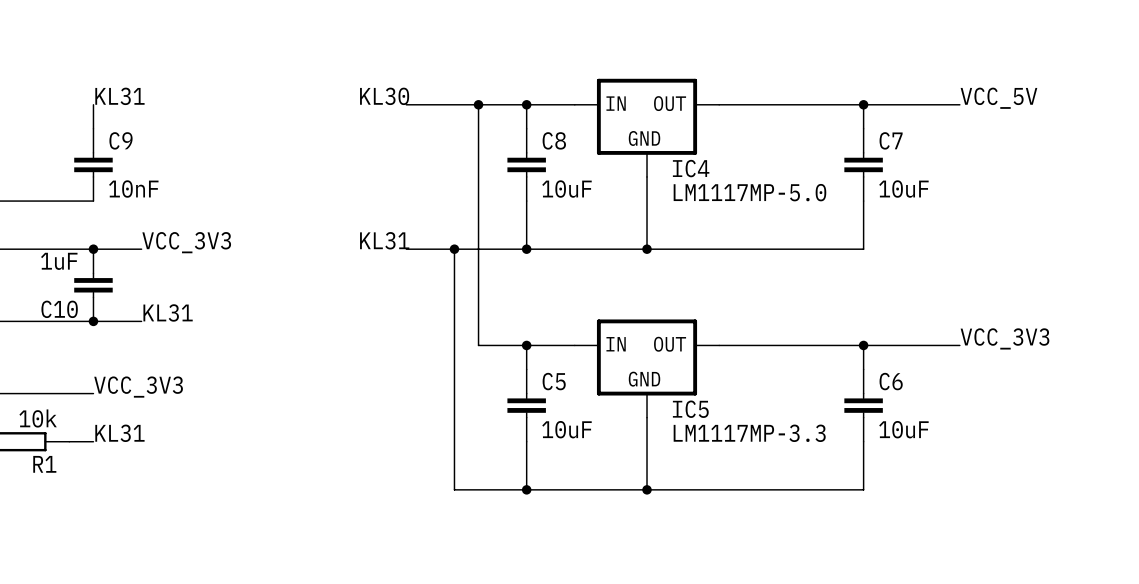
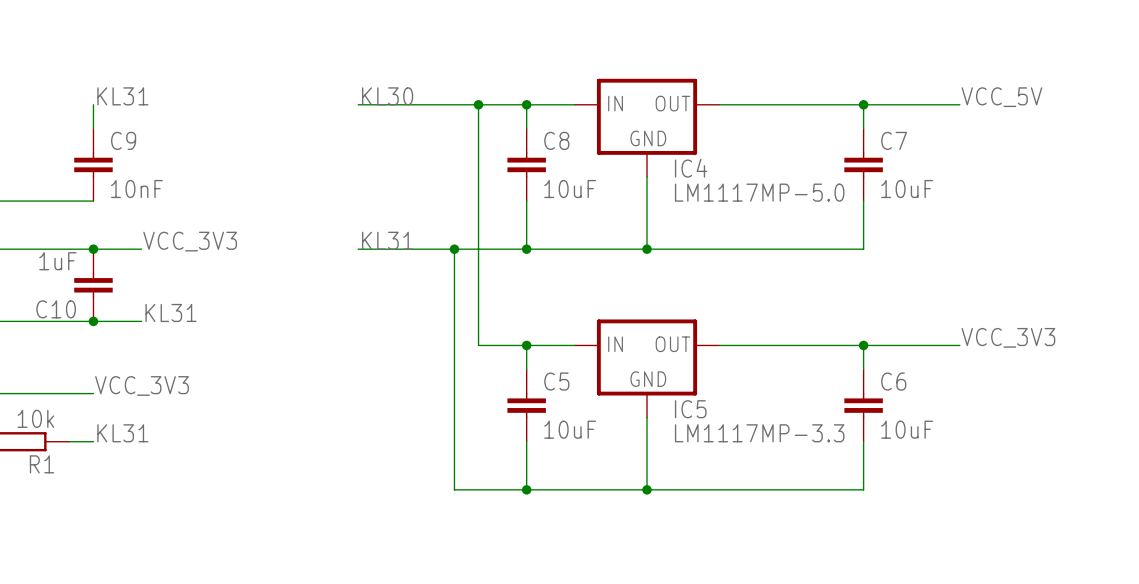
wire: none -> (358, 104) (406, 104)
wire: none -> (358, 249) (406, 249)

